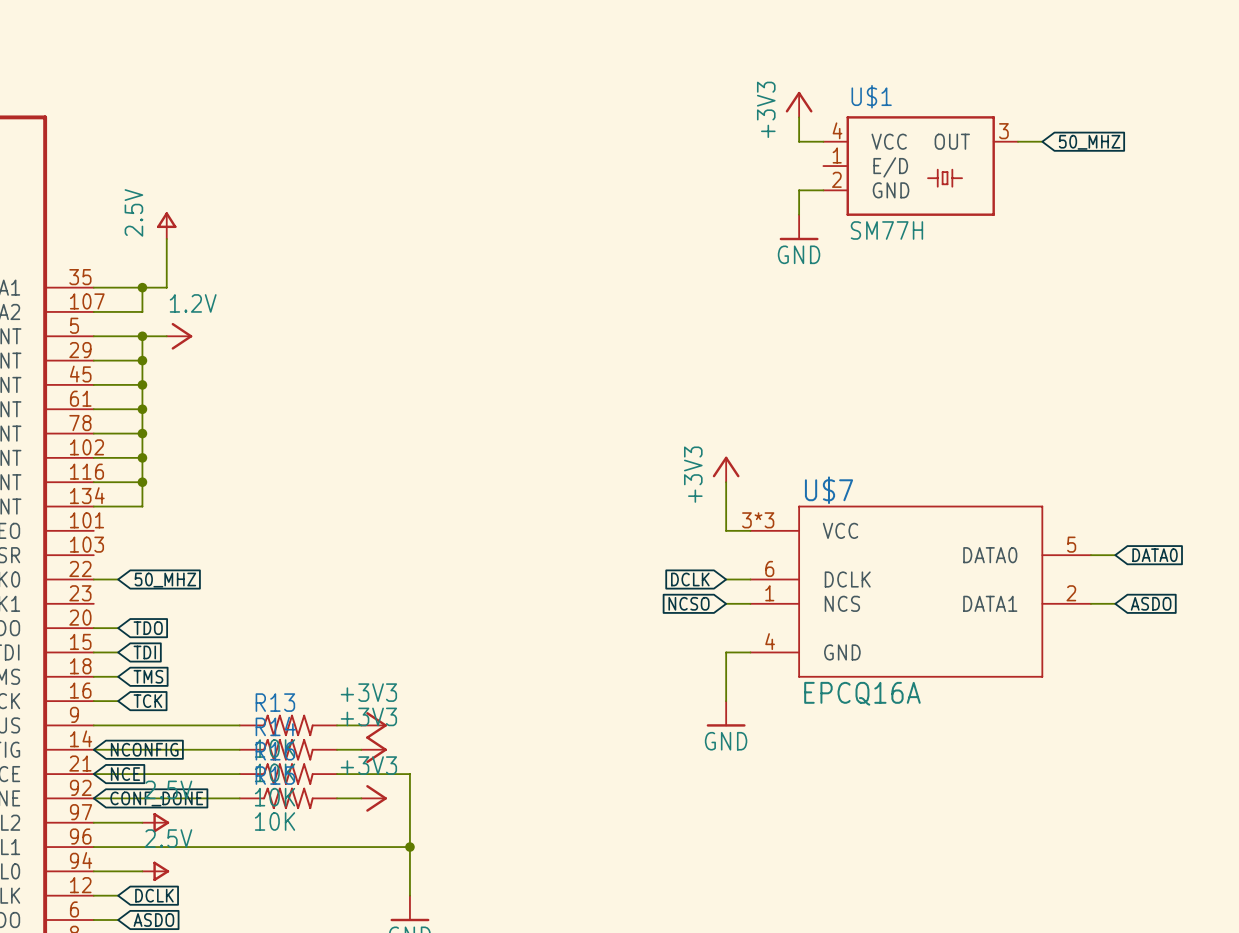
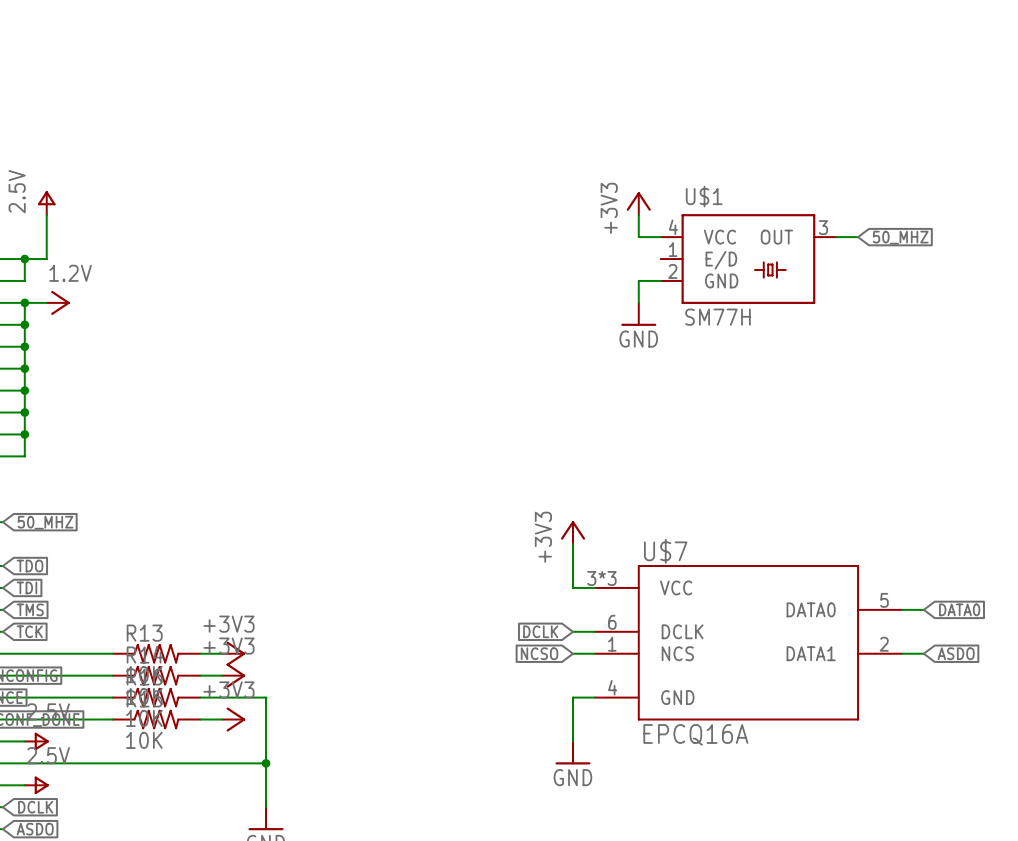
power symbol position: +3V3 (799, 104) -> +3V3 (638, 203)
wire: (799, 117) (799, 141) (823, 141) -> (638, 215) (638, 237) (660, 237)
wire: (1018, 141) (1042, 141) -> (836, 237) (858, 237)
global label position: 50_MHZ (1089, 142) -> 50_MHZ (900, 237)
U$1 position: (920, 166) -> (748, 259)
wire: (823, 190) (799, 190) (799, 214) -> (660, 280) (638, 280) (638, 302)
power symbol position: GND (799, 227) -> GND (638, 314)
power symbol position: +3V3 (726, 469) -> +3V3 (573, 532)
wire: (726, 482) (726, 530) (750, 530) -> none
wire: (1090, 555) (1115, 555) -> (901, 609) (923, 609)
global label position: DATA0 (1155, 555) -> DATA0 (959, 609)
global label position: DCLK (690, 579) -> DCLK (540, 631)
wire: (726, 579) (750, 579) -> (573, 631) (594, 631)
U$7 position: (920, 591) -> (748, 642)
global label position: NCSO (689, 603) -> NCSO (539, 653)
wire: (726, 603) (750, 603) -> (594, 587) (573, 587) (573, 544)
wire: (1090, 603) (1115, 603) -> (901, 653) (923, 653)
global label position: ASDO (1151, 603) -> ASDO (956, 653)
wire: (750, 652) (726, 652) (726, 701) -> (594, 697) (573, 697) (573, 741)
power symbol position: GND (726, 713) -> GND (573, 752)
wire: none -> (573, 653) (594, 653)

